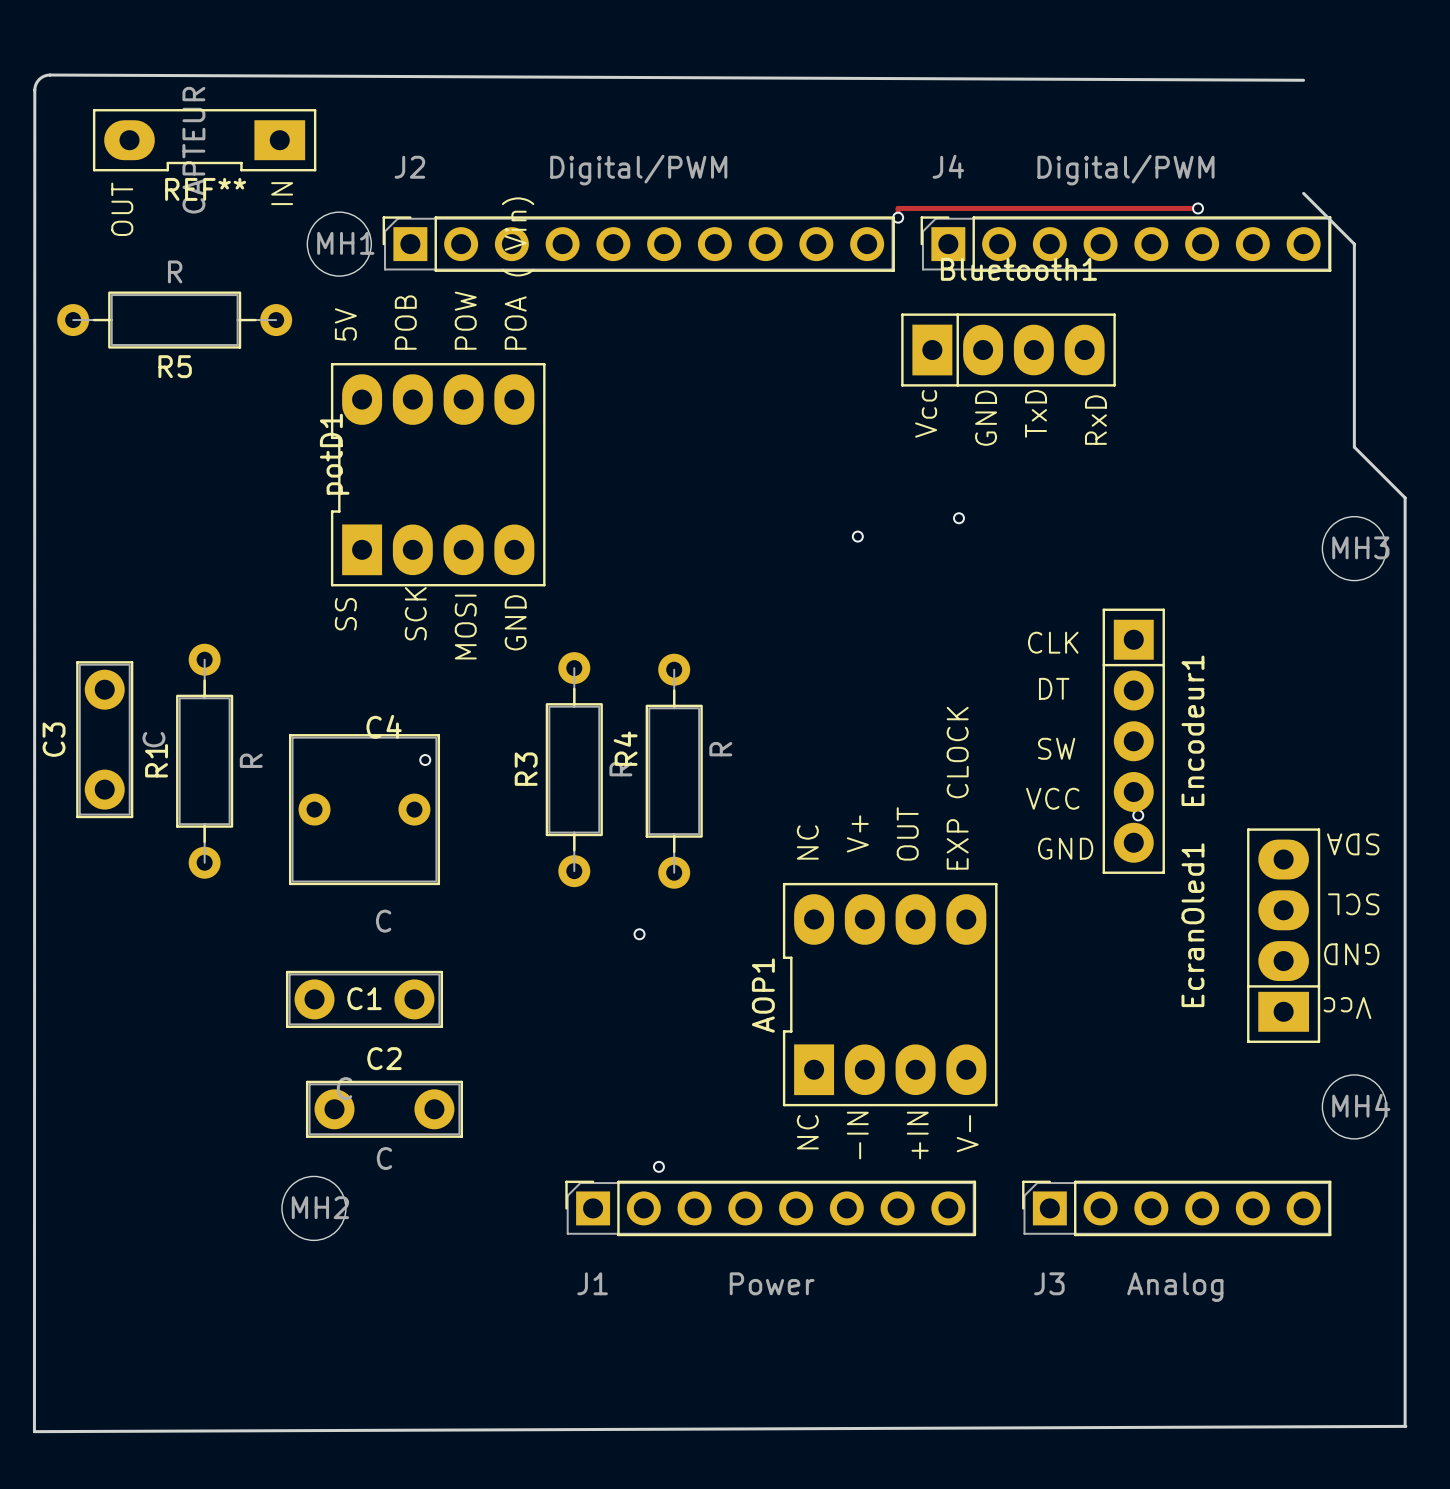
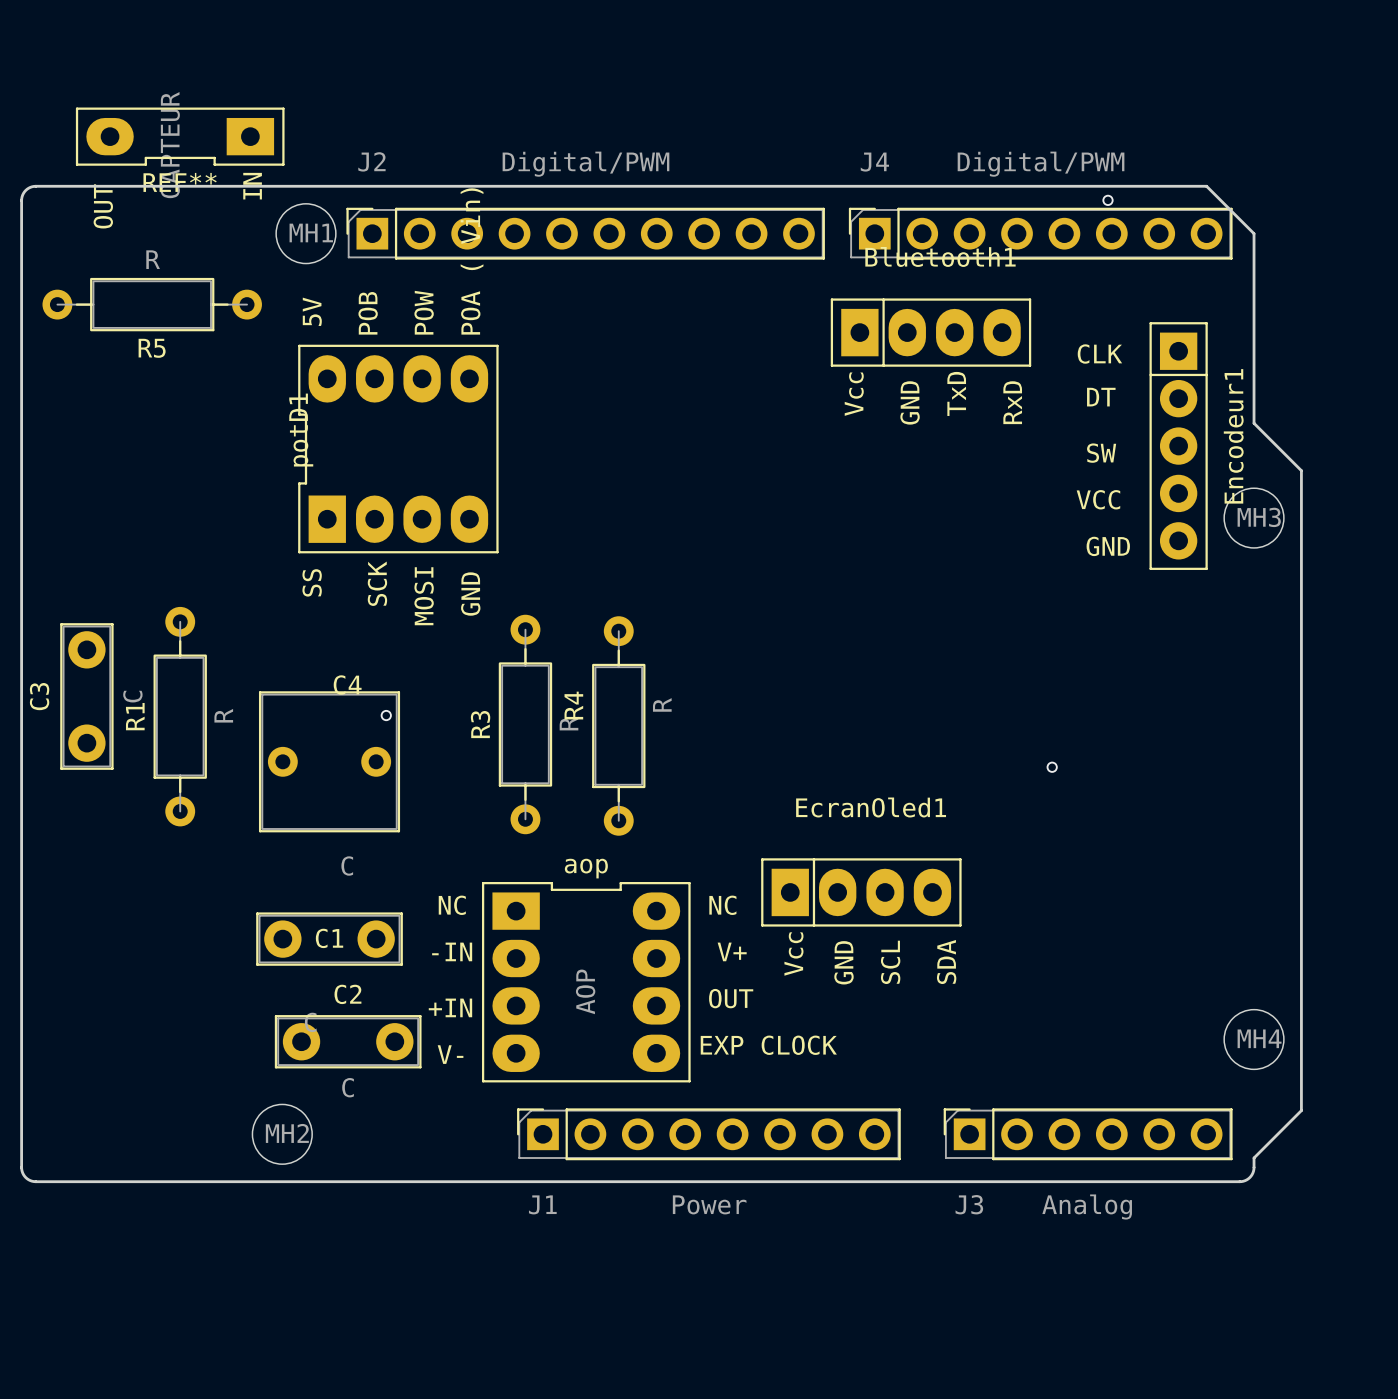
board edge: (1303, 80) (50, 75) (39, 79) (34, 90) (34, 1431) (1405, 1426) -> none
track: (1198, 208) (898, 208) (898, 217) -> none
via: (898, 217) -> none
via: (958, 518) -> none
via: (857, 536) -> none
Encodeur1 position: (1133, 741) -> (1178, 446)
via: (639, 934) -> none
EcranOled1 rotation: 0° (1283, 935) -> 90° clockwise (861, 892)
EcranOled1 position: (1283, 935) -> (861, 892)
AOP1: (890, 994) -> none
aop: none -> AOP (586, 982)
via: (658, 1166) -> none
board edge: (1405, 1183) (1405, 1426) -> (1301, 1110) (1254, 1158) (1253, 1169) (1251, 1176) (1239, 1181) (35, 1181) (25, 1177) (21, 1169) (21, 200) (27, 189) (35, 186) (1206, 186)

